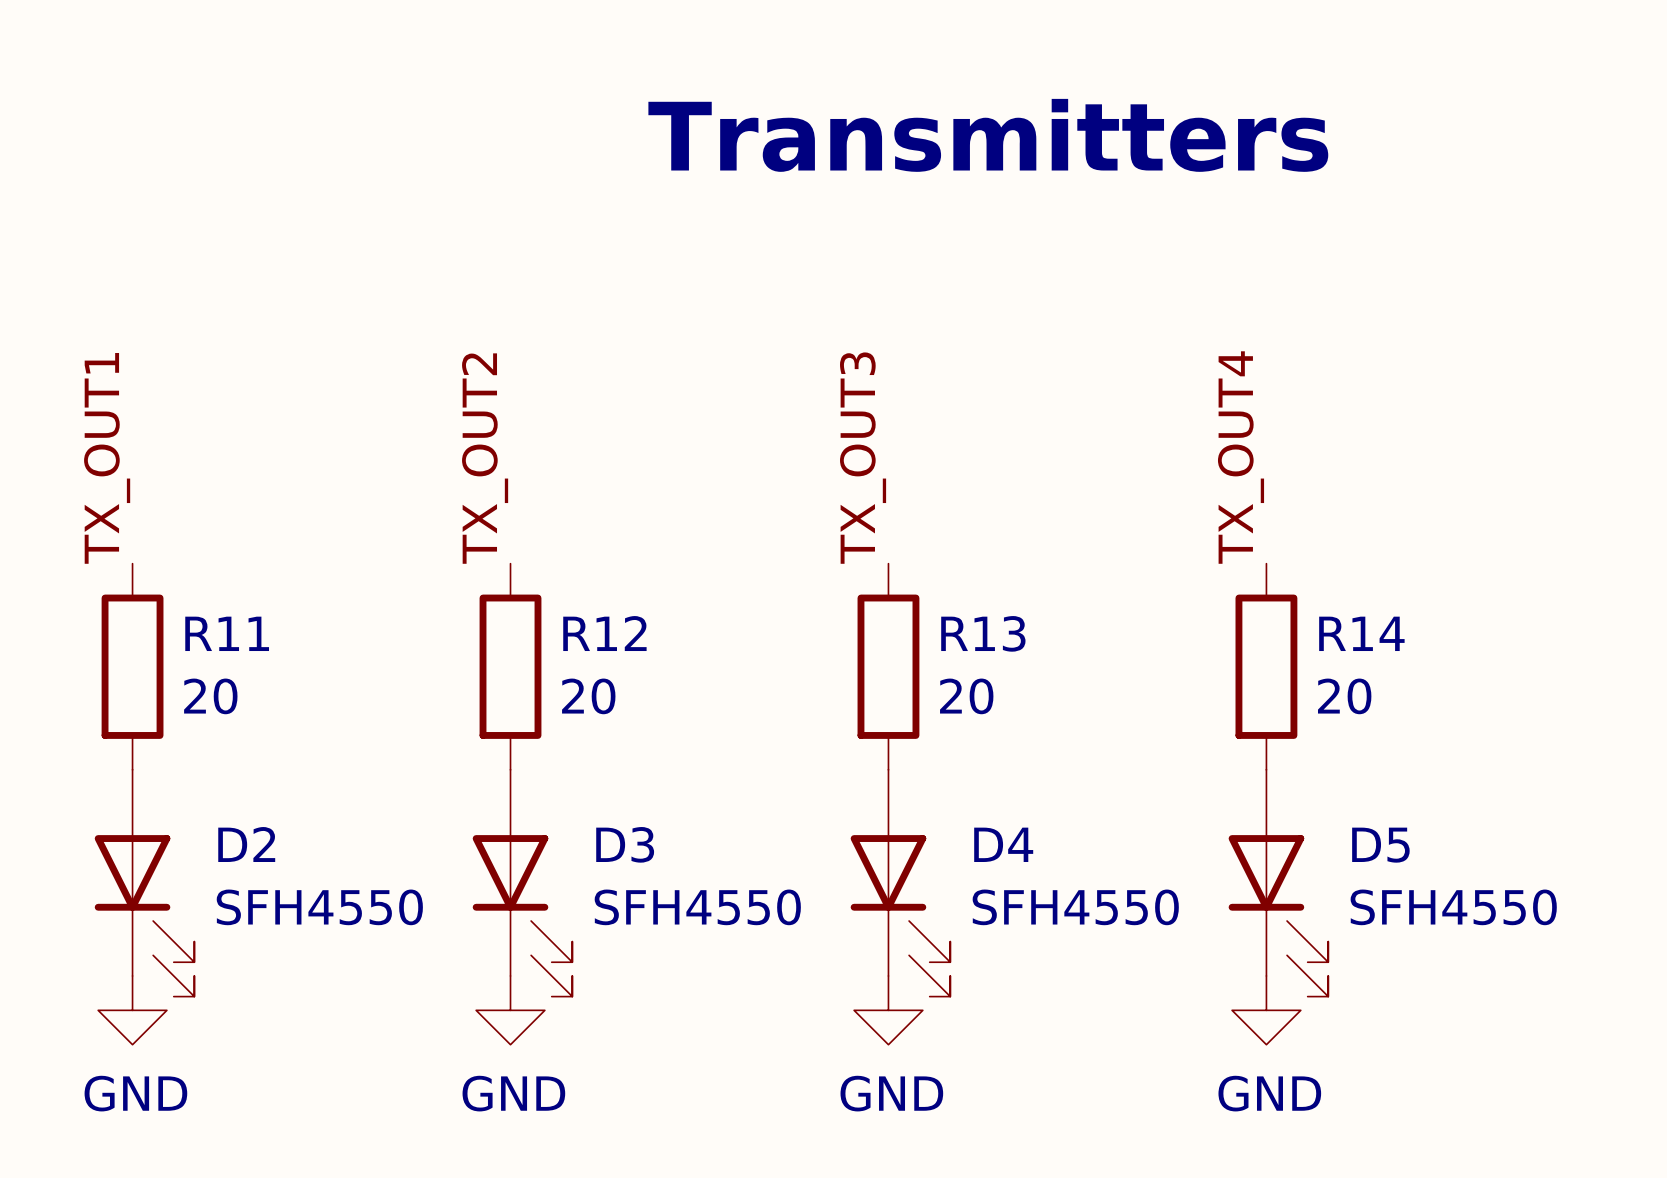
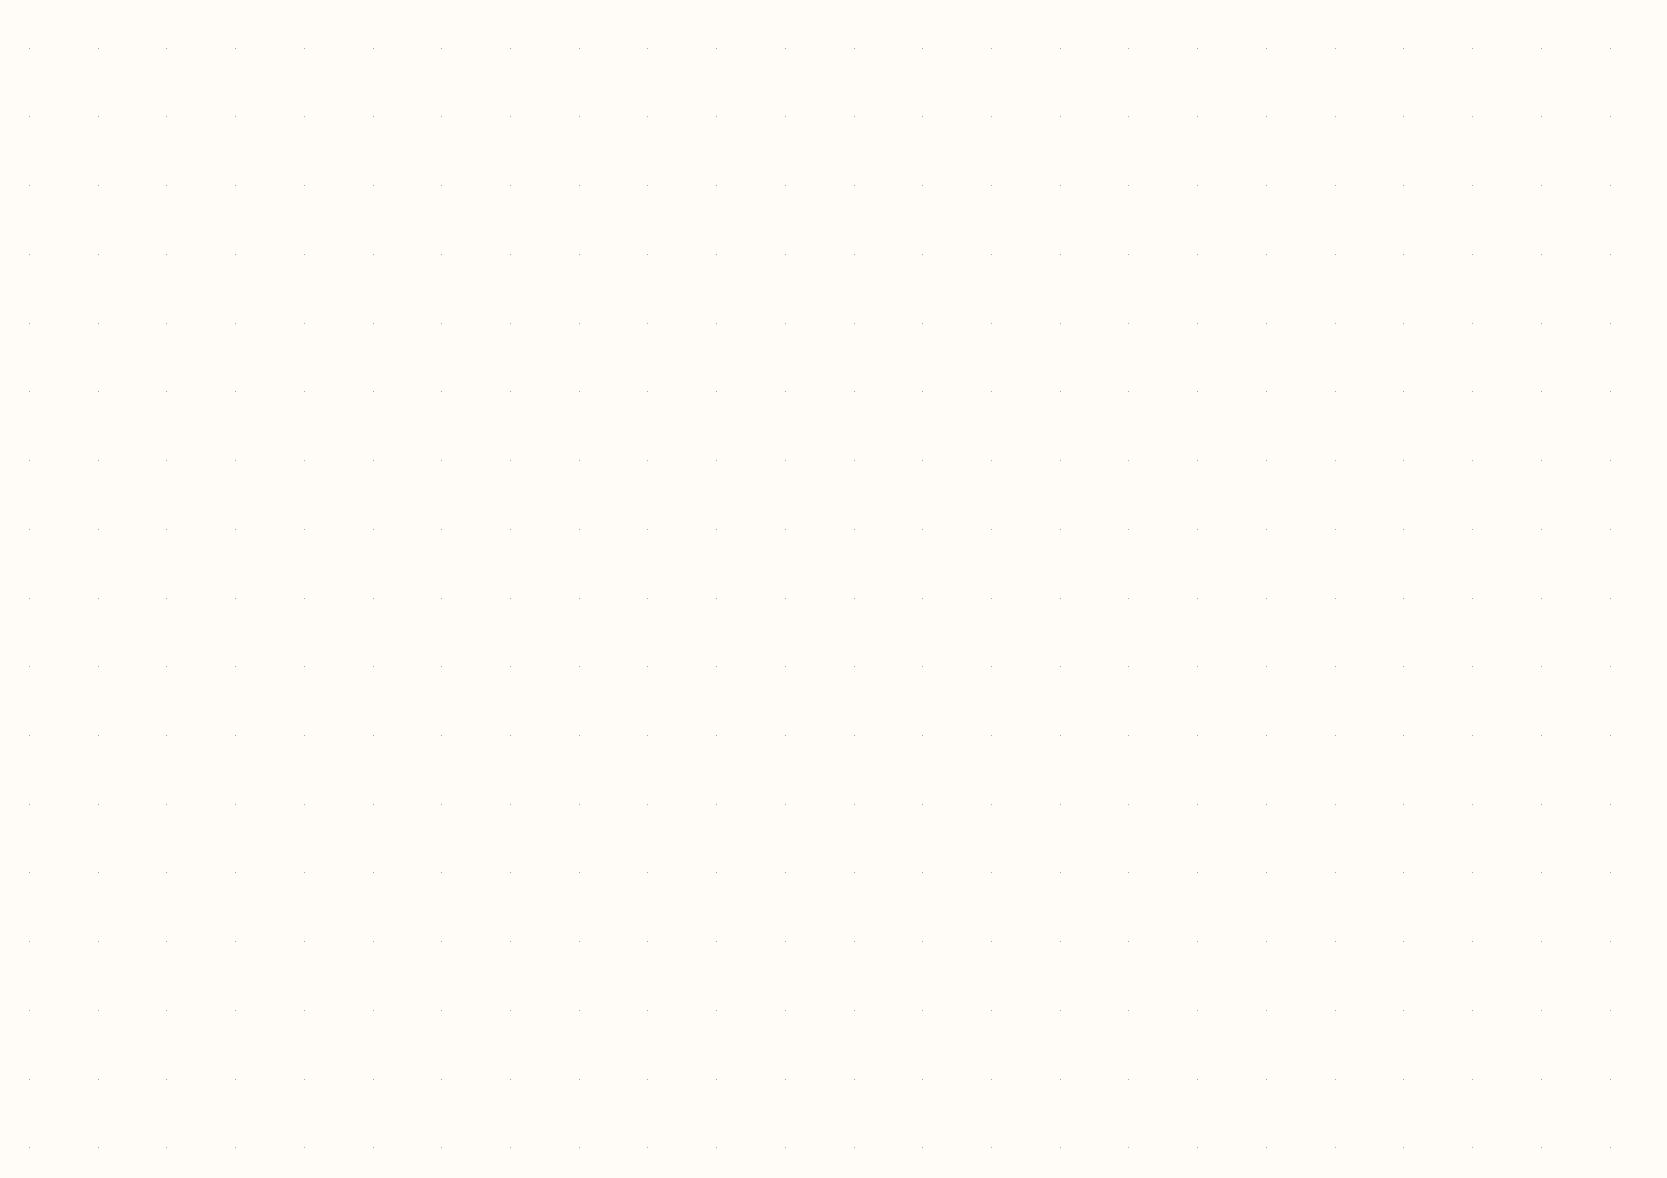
text: Transmitters (988, 135) -> none
label: TX_OUT4 (1241, 457) -> none
label: TX_OUT1 (107, 458) -> none
label: TX_OUT2 (485, 458) -> none
label: TX_OUT3 (863, 458) -> none
R11: 20 (132, 666) -> none
R12: 20 (510, 666) -> none
R13: 20 (888, 666) -> none
R14: 20 (1266, 666) -> none
D2: SFH4550 (144, 883) -> none
D3: SFH4550 (522, 883) -> none
D4: SFH4550 (900, 883) -> none
D5: SFH4550 (1278, 883) -> none
power symbol: GND (132, 1010) -> none
power symbol: GND (510, 1010) -> none
power symbol: GND (888, 1010) -> none
power symbol: GND (1266, 1010) -> none

